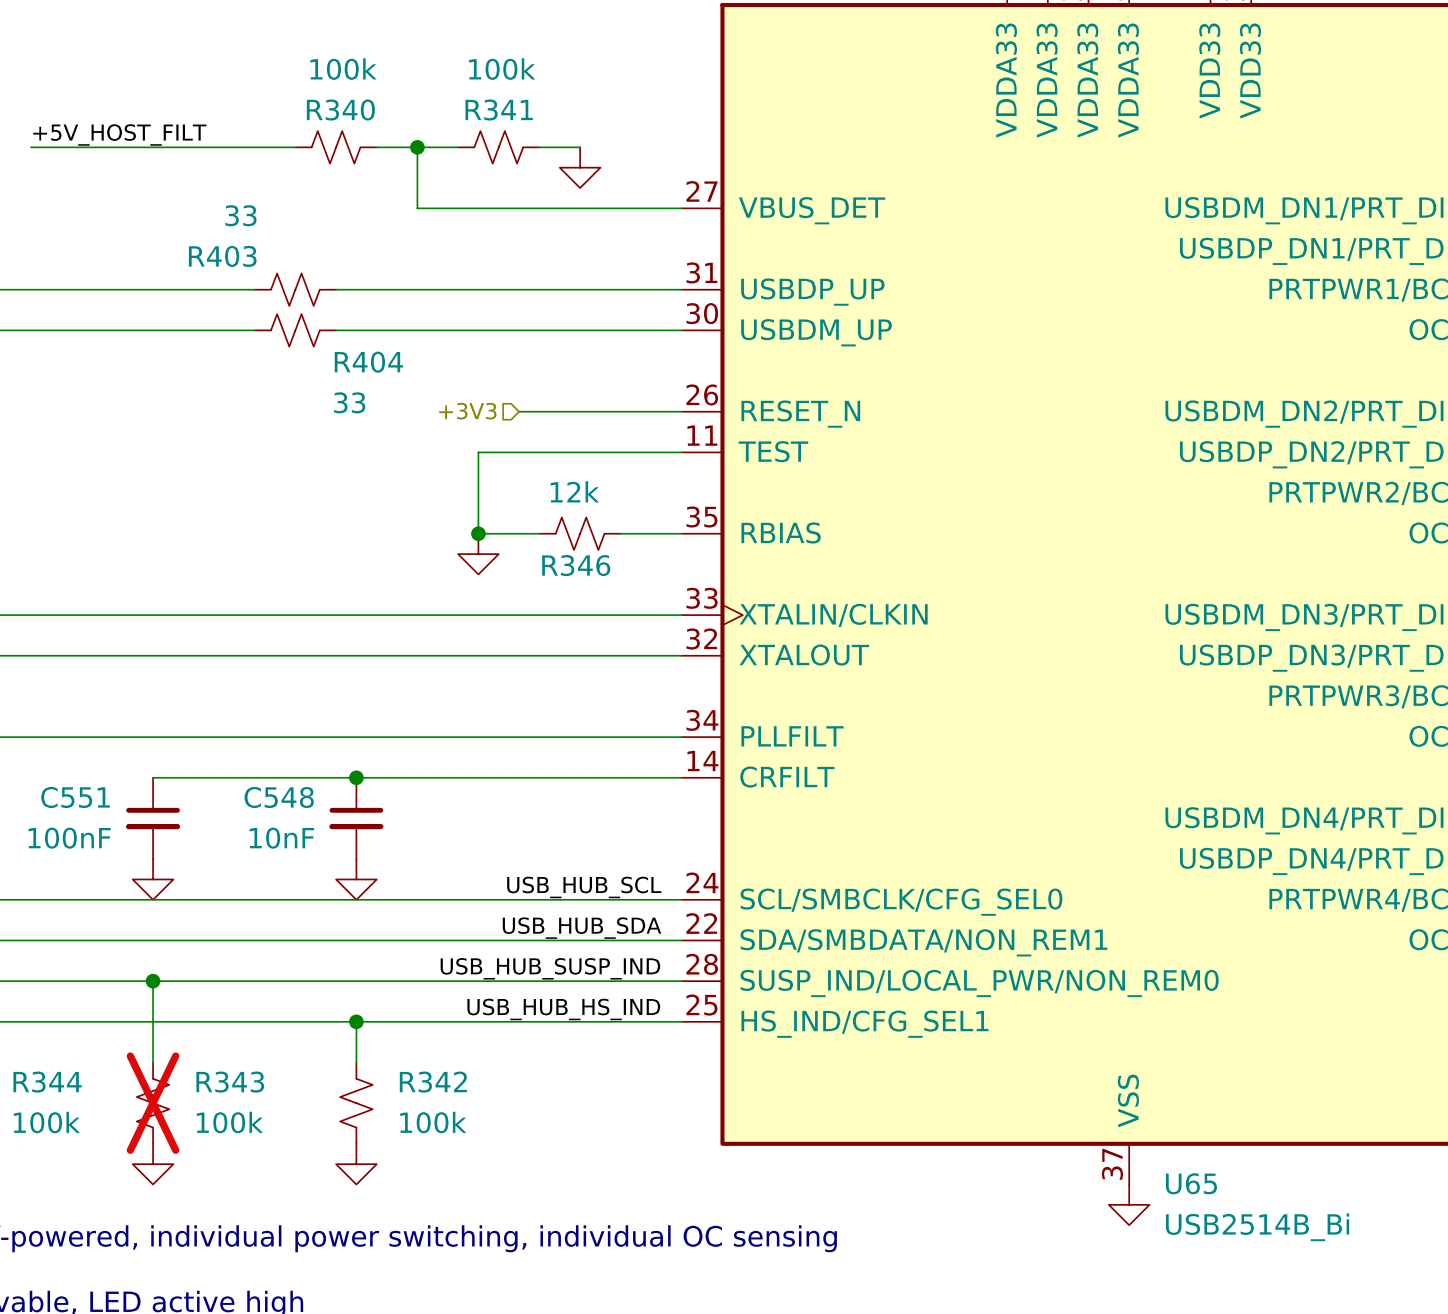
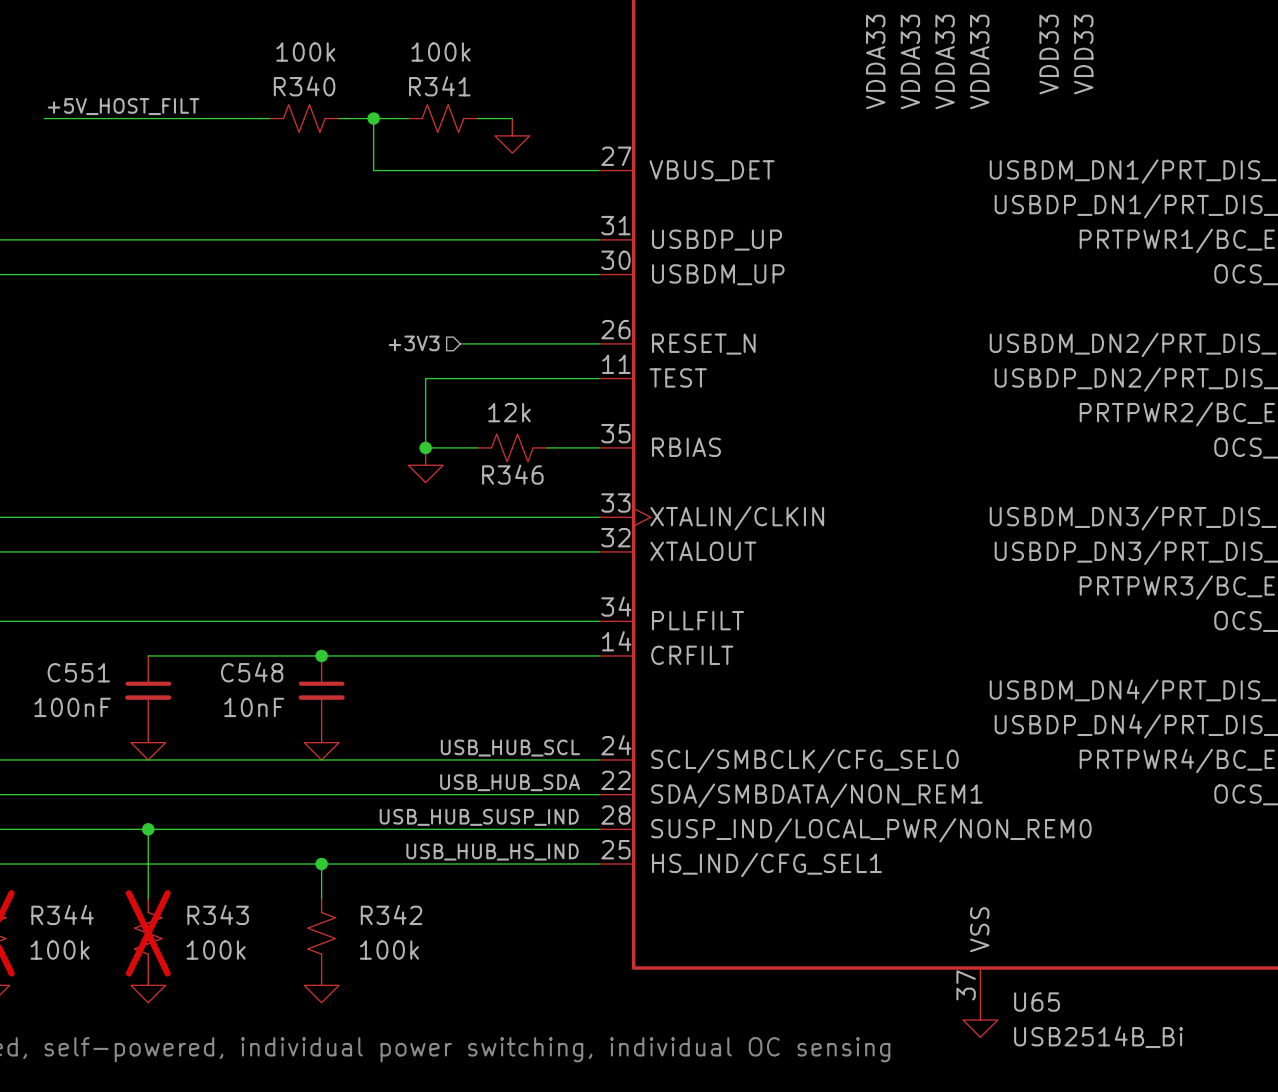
wire: none -> (234, 239) (304, 239)
R403: 33 (295, 289) -> none
wire: none -> (234, 274) (304, 274)
R404: 33 (295, 330) -> none

